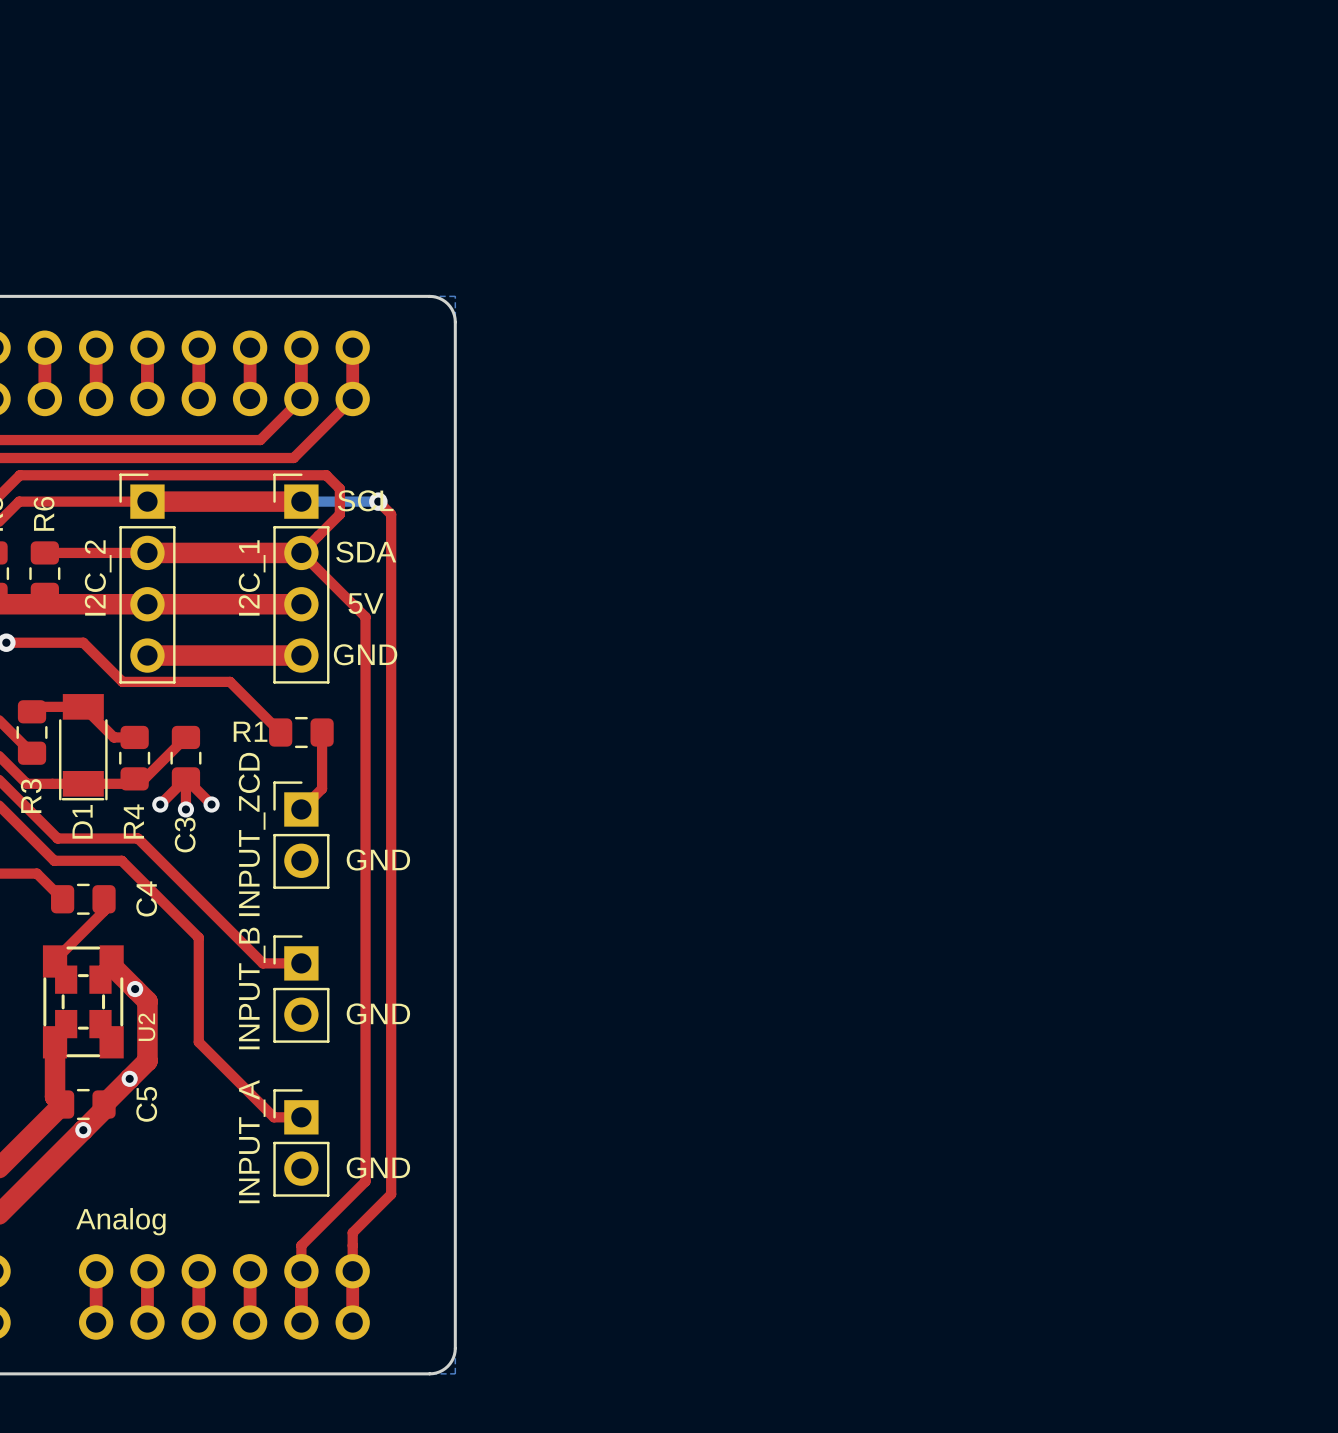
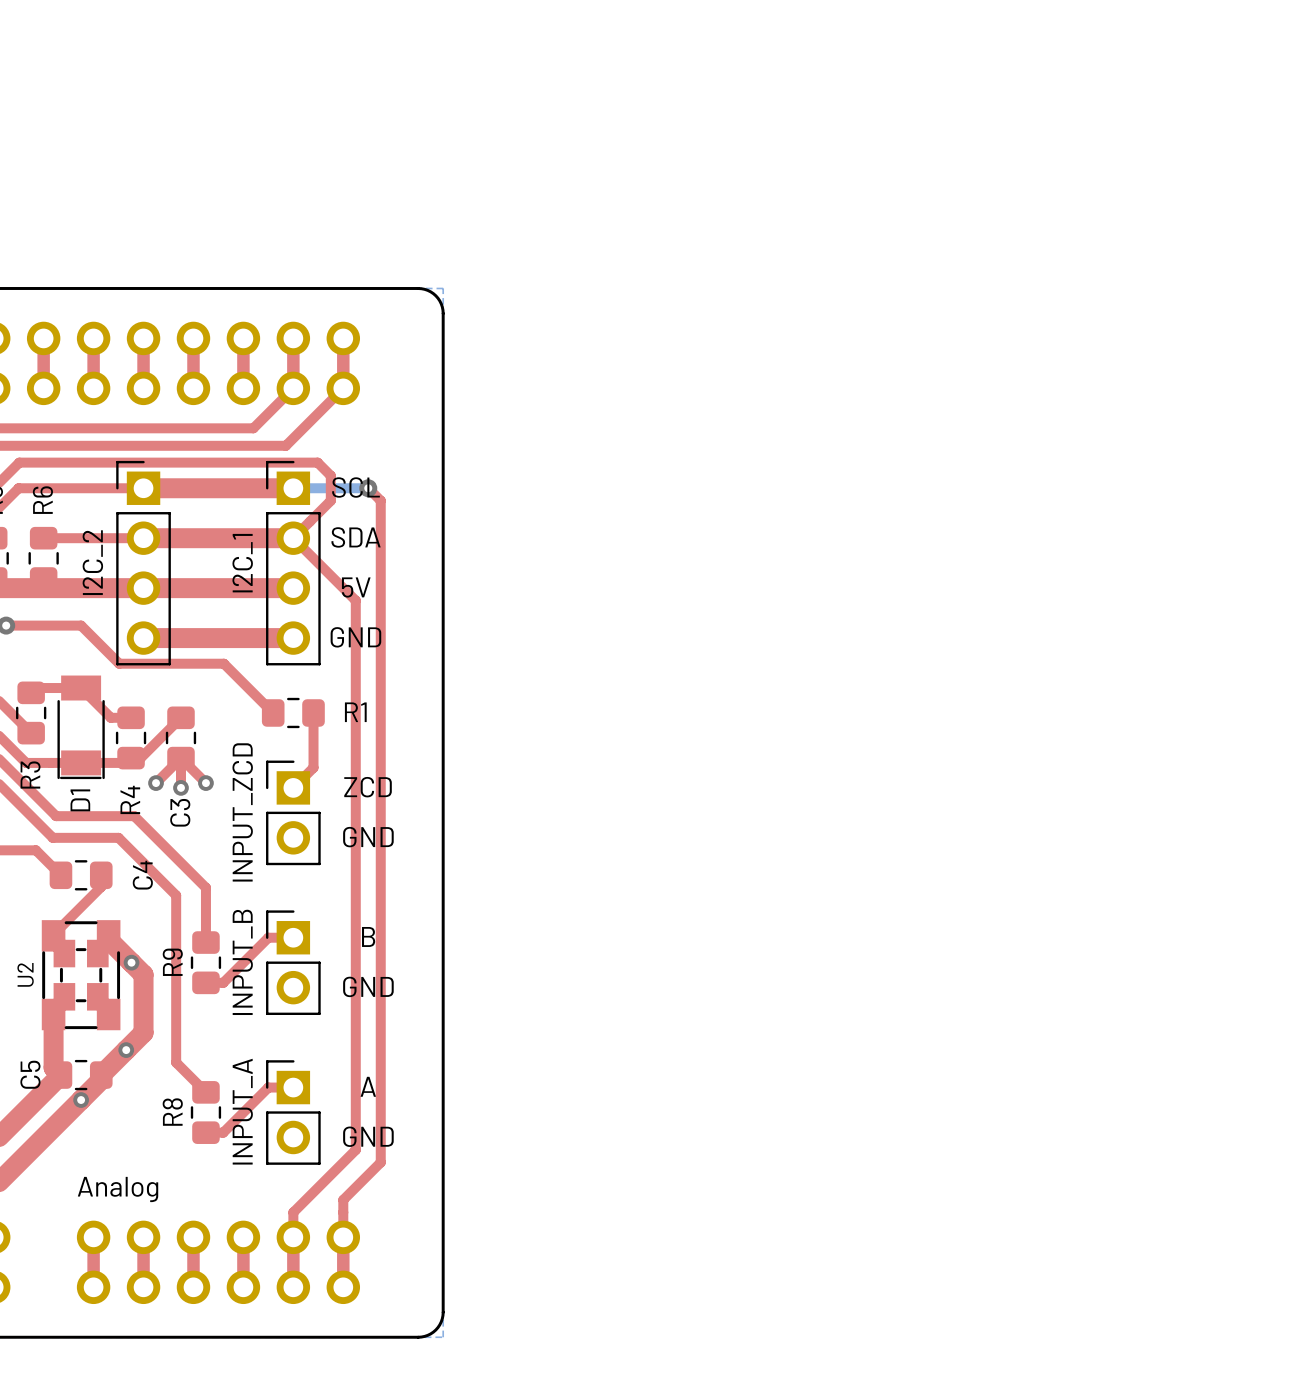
R1 name position: R1 (250, 731) -> R1 (355, 712)
text: none -> ZCD (368, 787)
top track: (211, 912) (262, 963) (275, 963) -> (205, 887) (205, 942)
top track: (181, 919) (198, 937) (198, 1042) (275, 1117) -> (176, 895) (176, 1062) (205, 1092)
text: none -> B (368, 936)
top track: none -> (268, 937) (223, 982) (205, 982)
R9: none -> (205, 962)
U2 name position: U2 (146, 1027) -> U2 (25, 974)
C5 name position: C5 (146, 1104) -> C5 (30, 1074)
text: none -> A (368, 1086)
top track: none -> (268, 1087) (223, 1132) (205, 1132)
R8: none -> (205, 1112)

